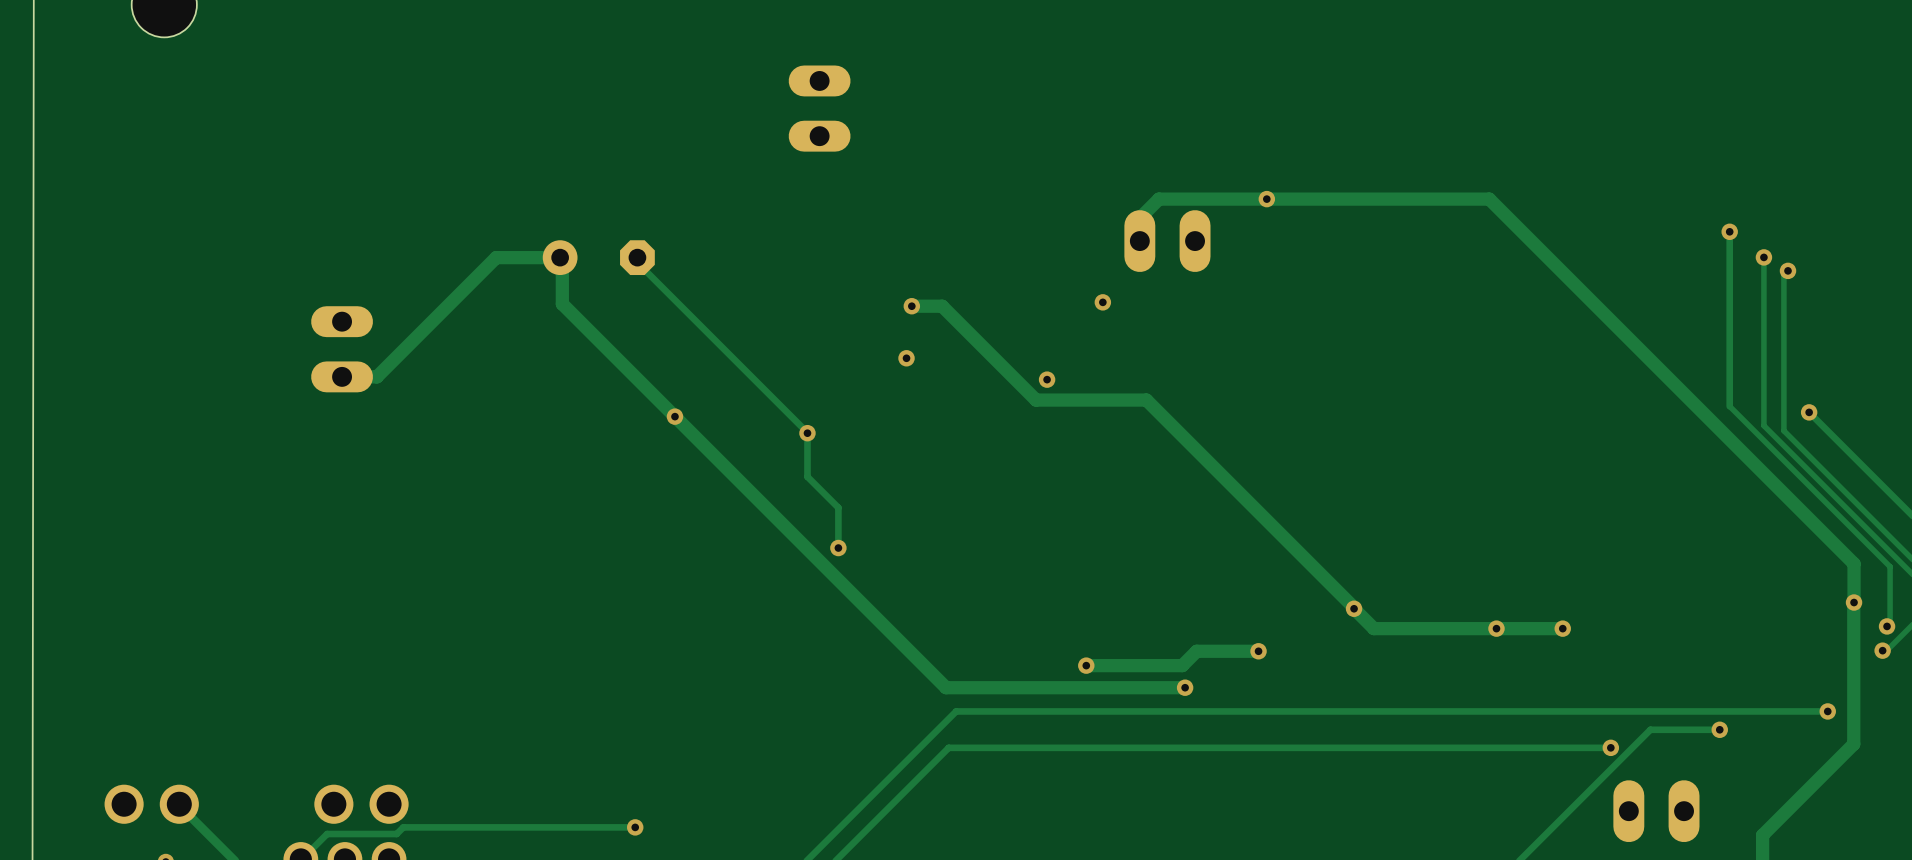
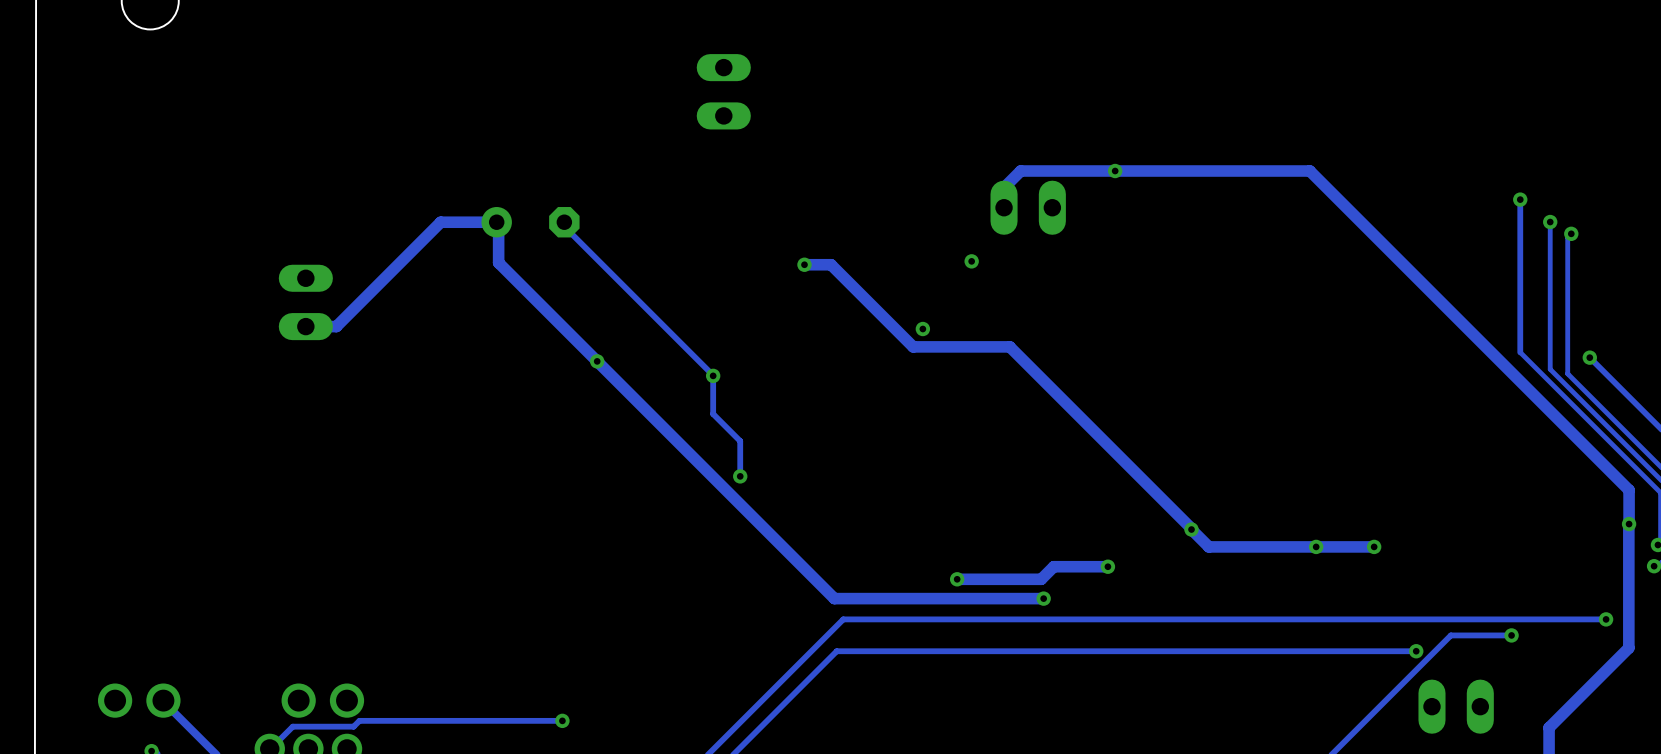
via: (906, 358) -> none

